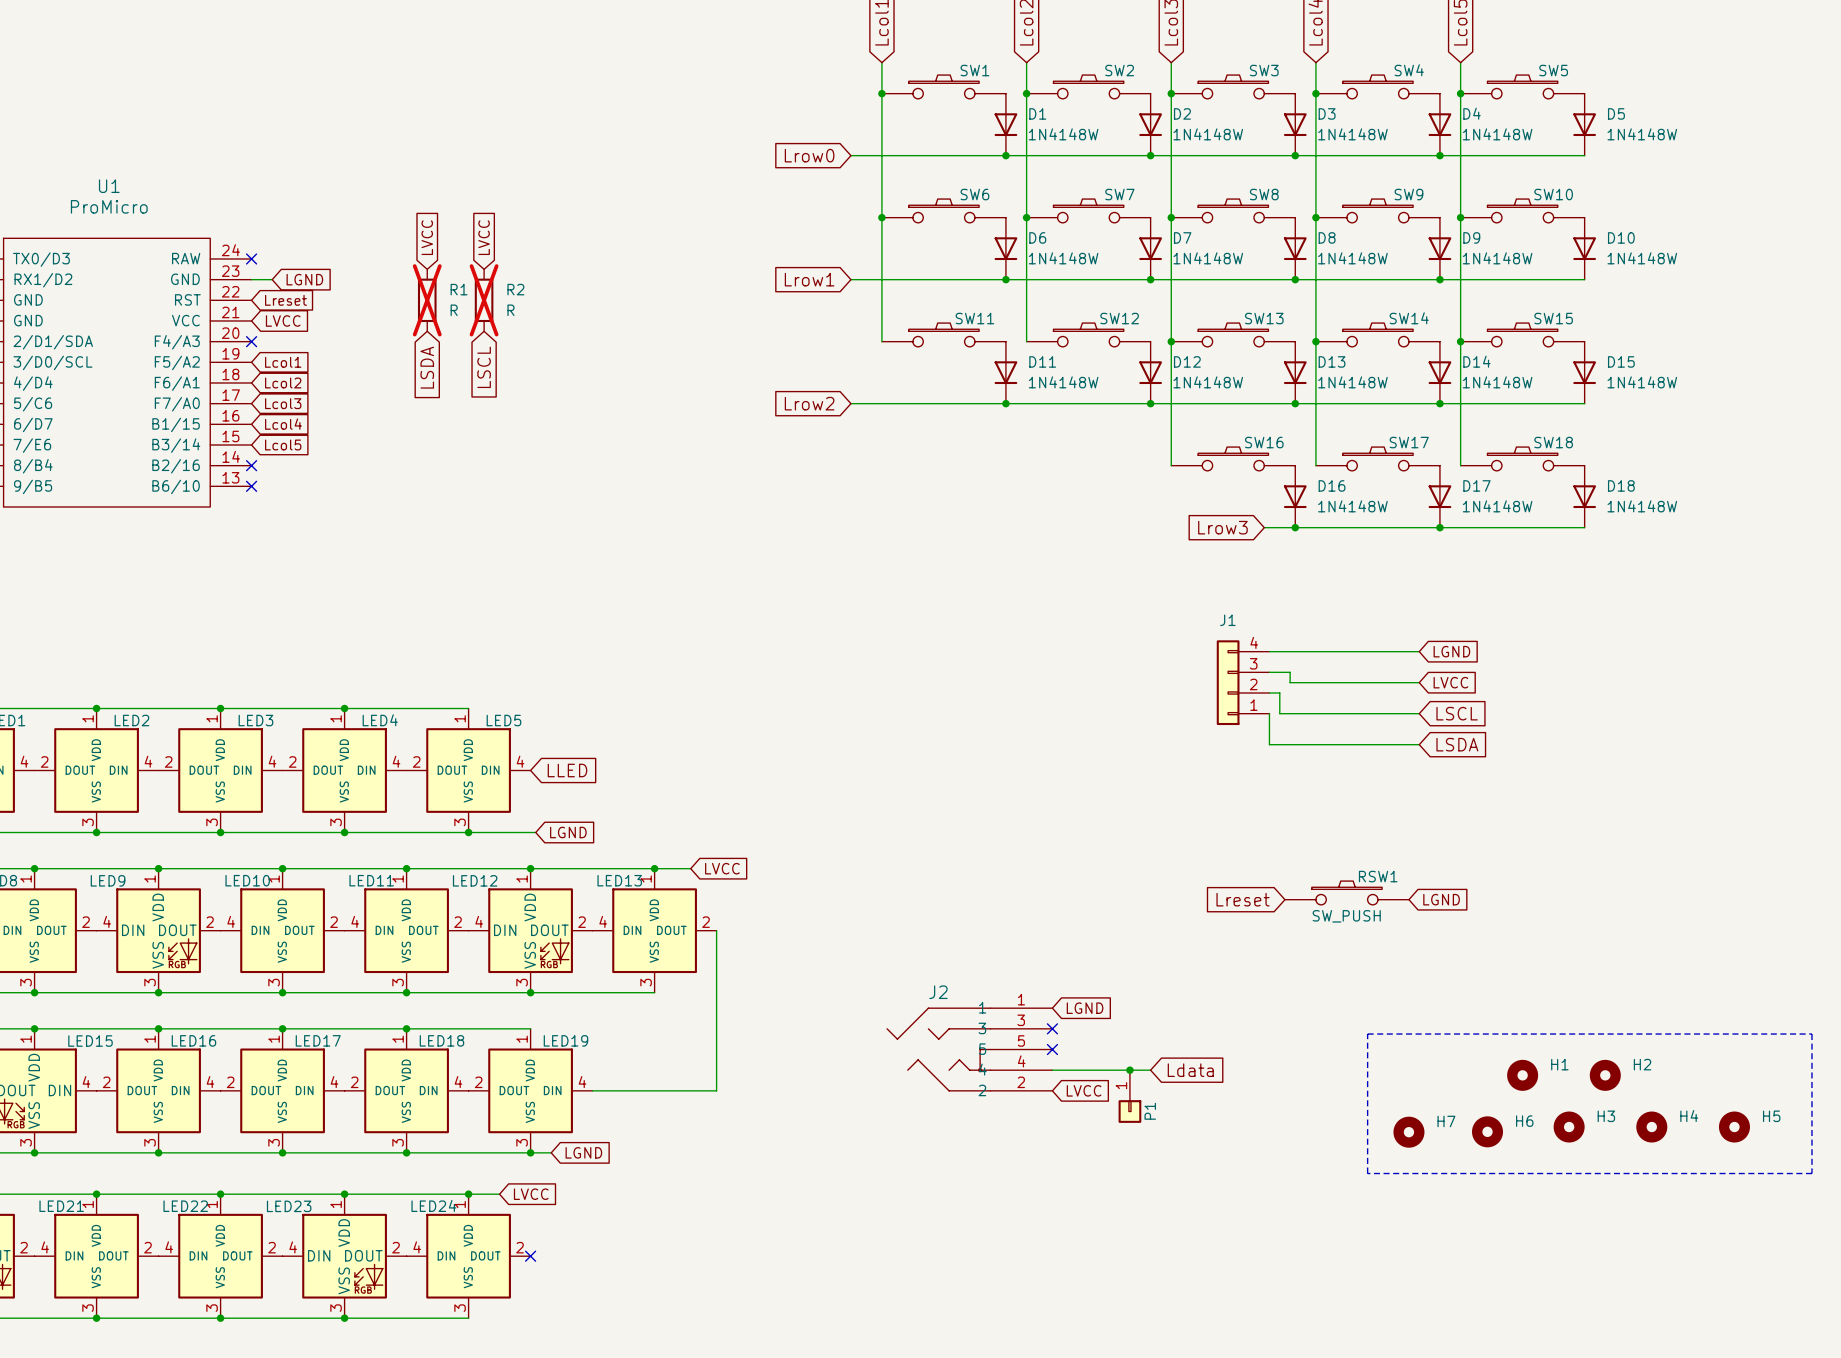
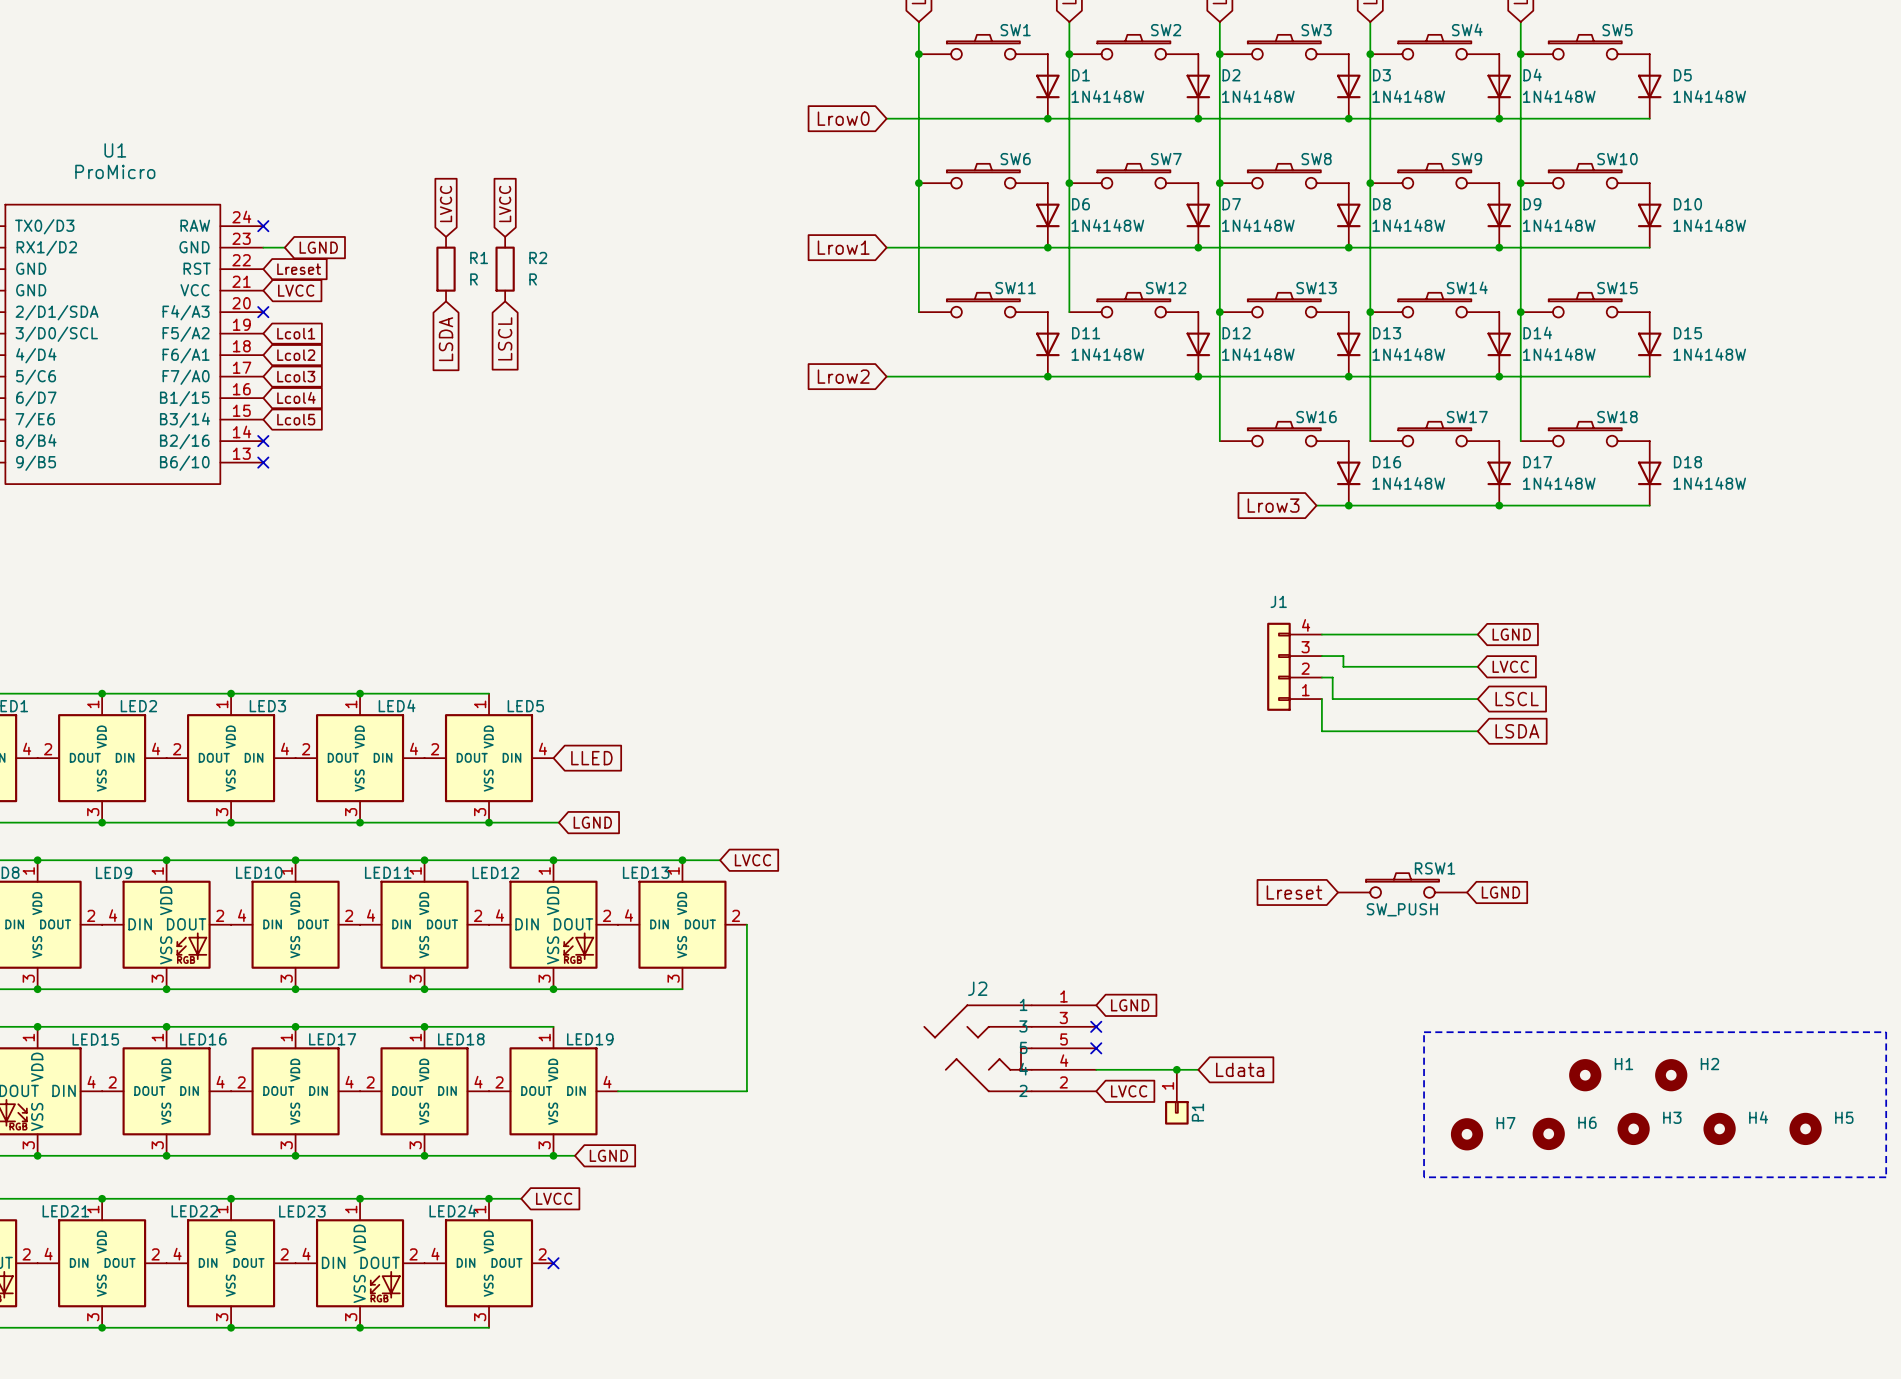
R1 do-not-place cross: (427, 300) -> none
R2 do-not-place cross: (484, 300) -> none

